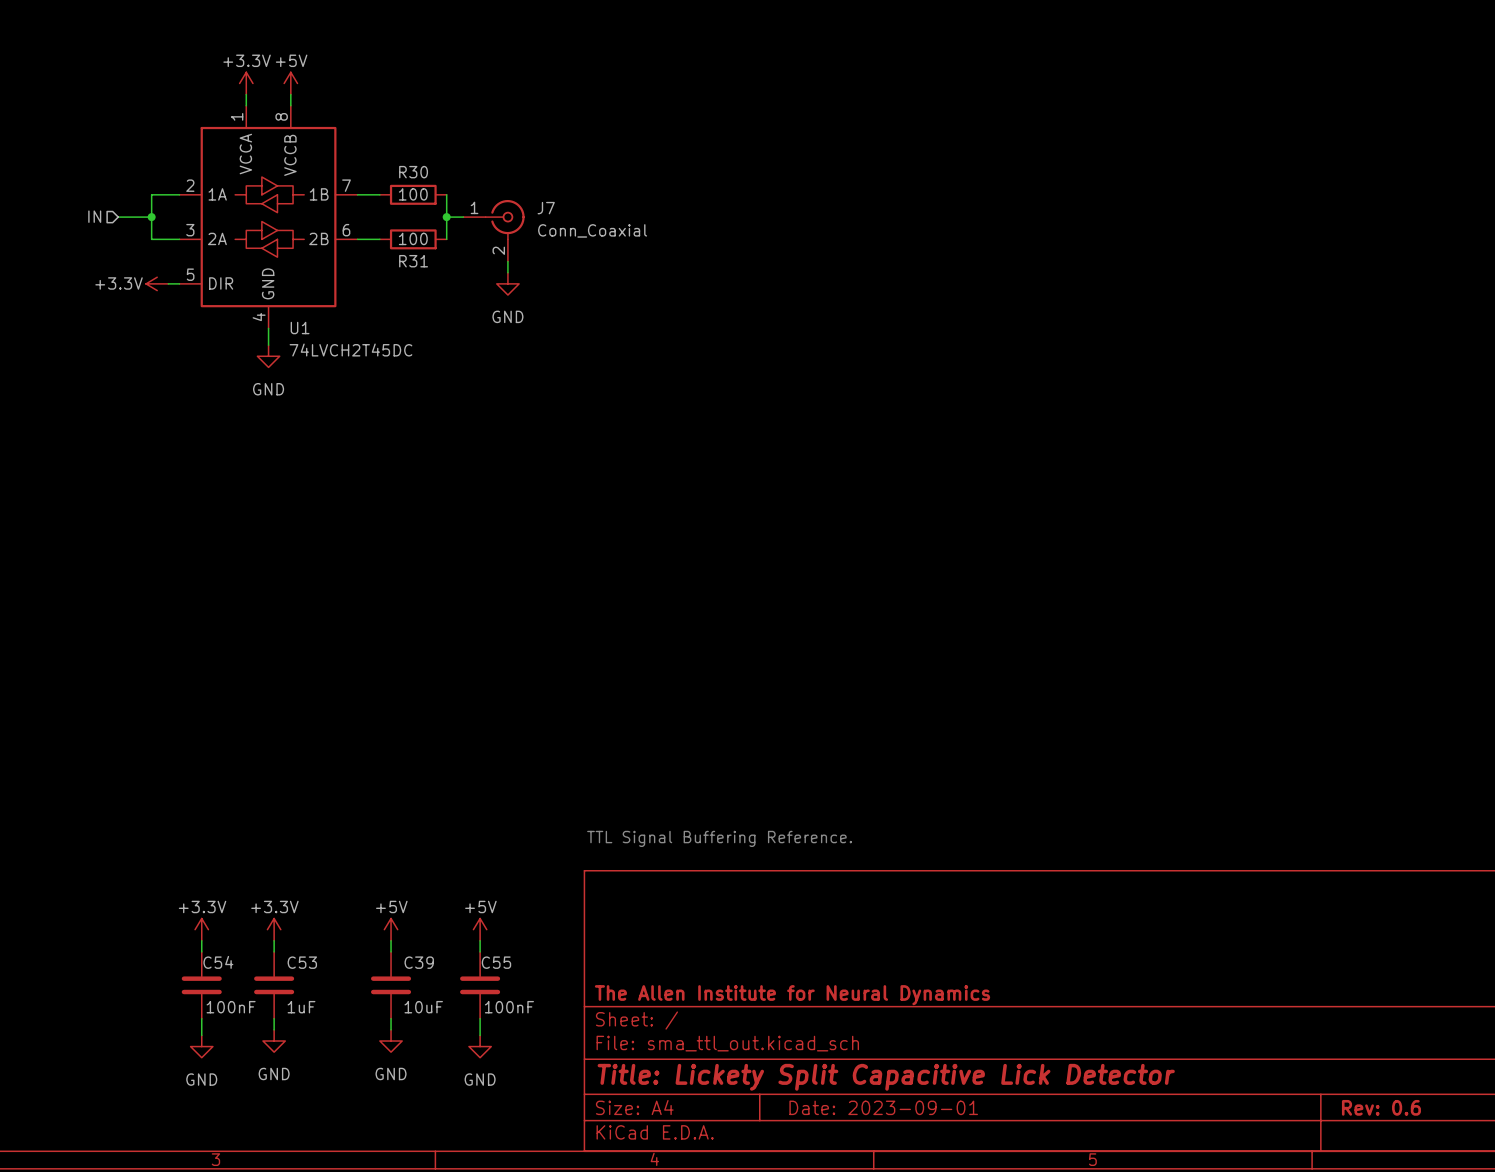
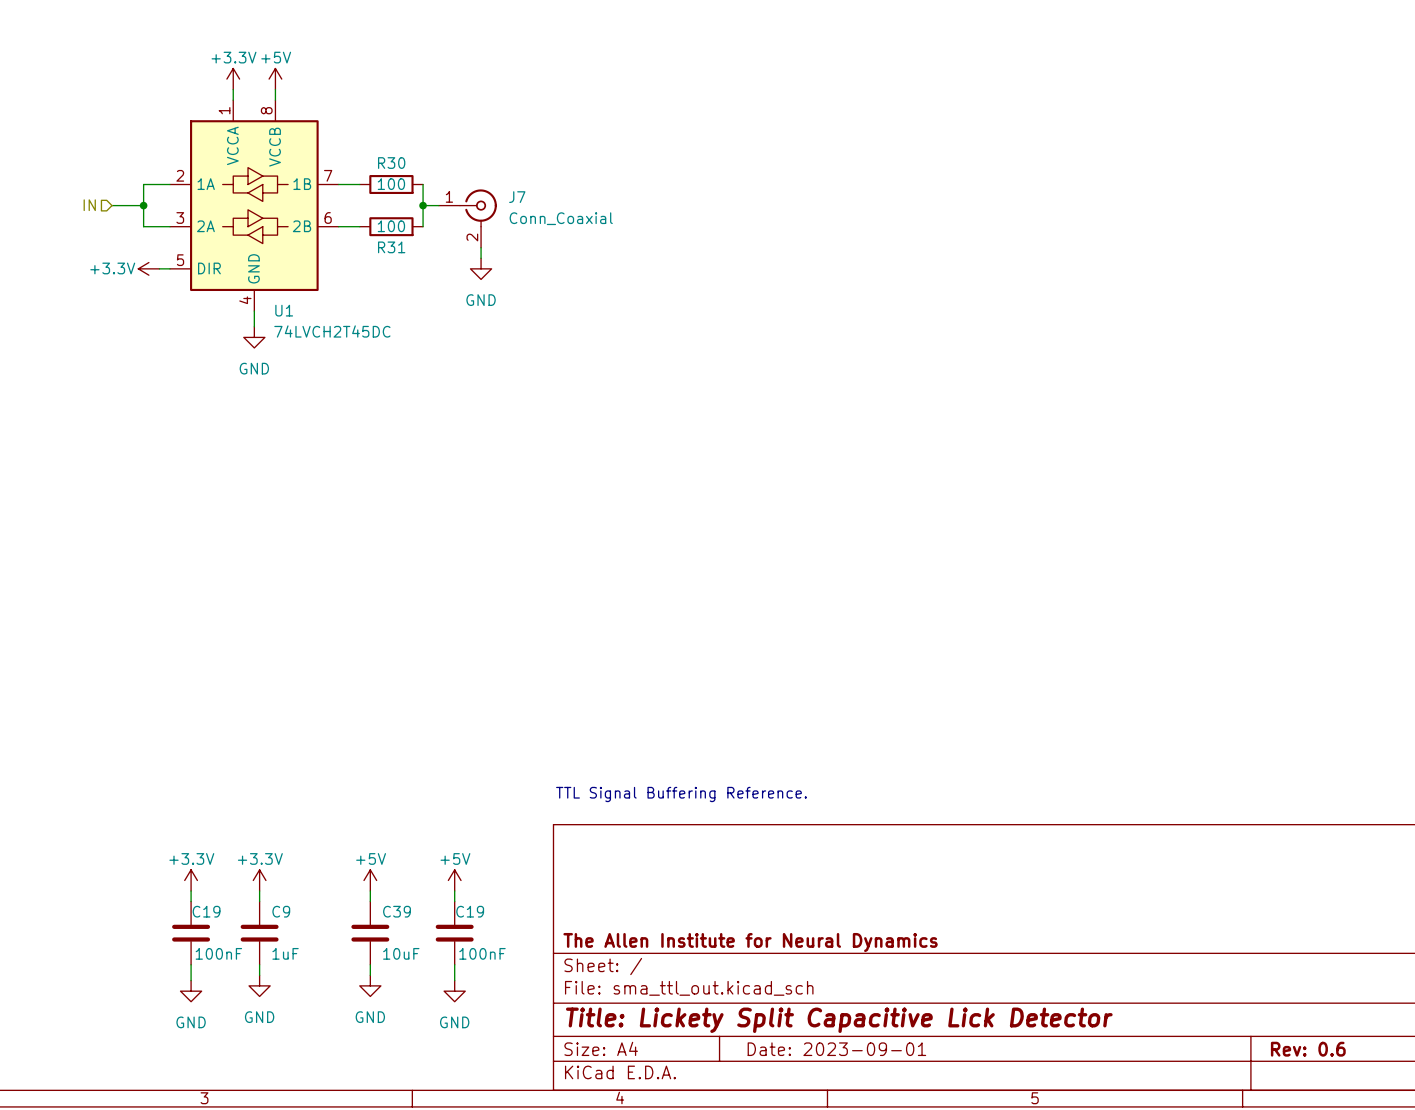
C54 name: C54 (218, 962) -> C19 (206, 911)
C53 name: C53 (302, 962) -> C9 (281, 911)
C55 name: C55 (496, 962) -> C19 (470, 911)

